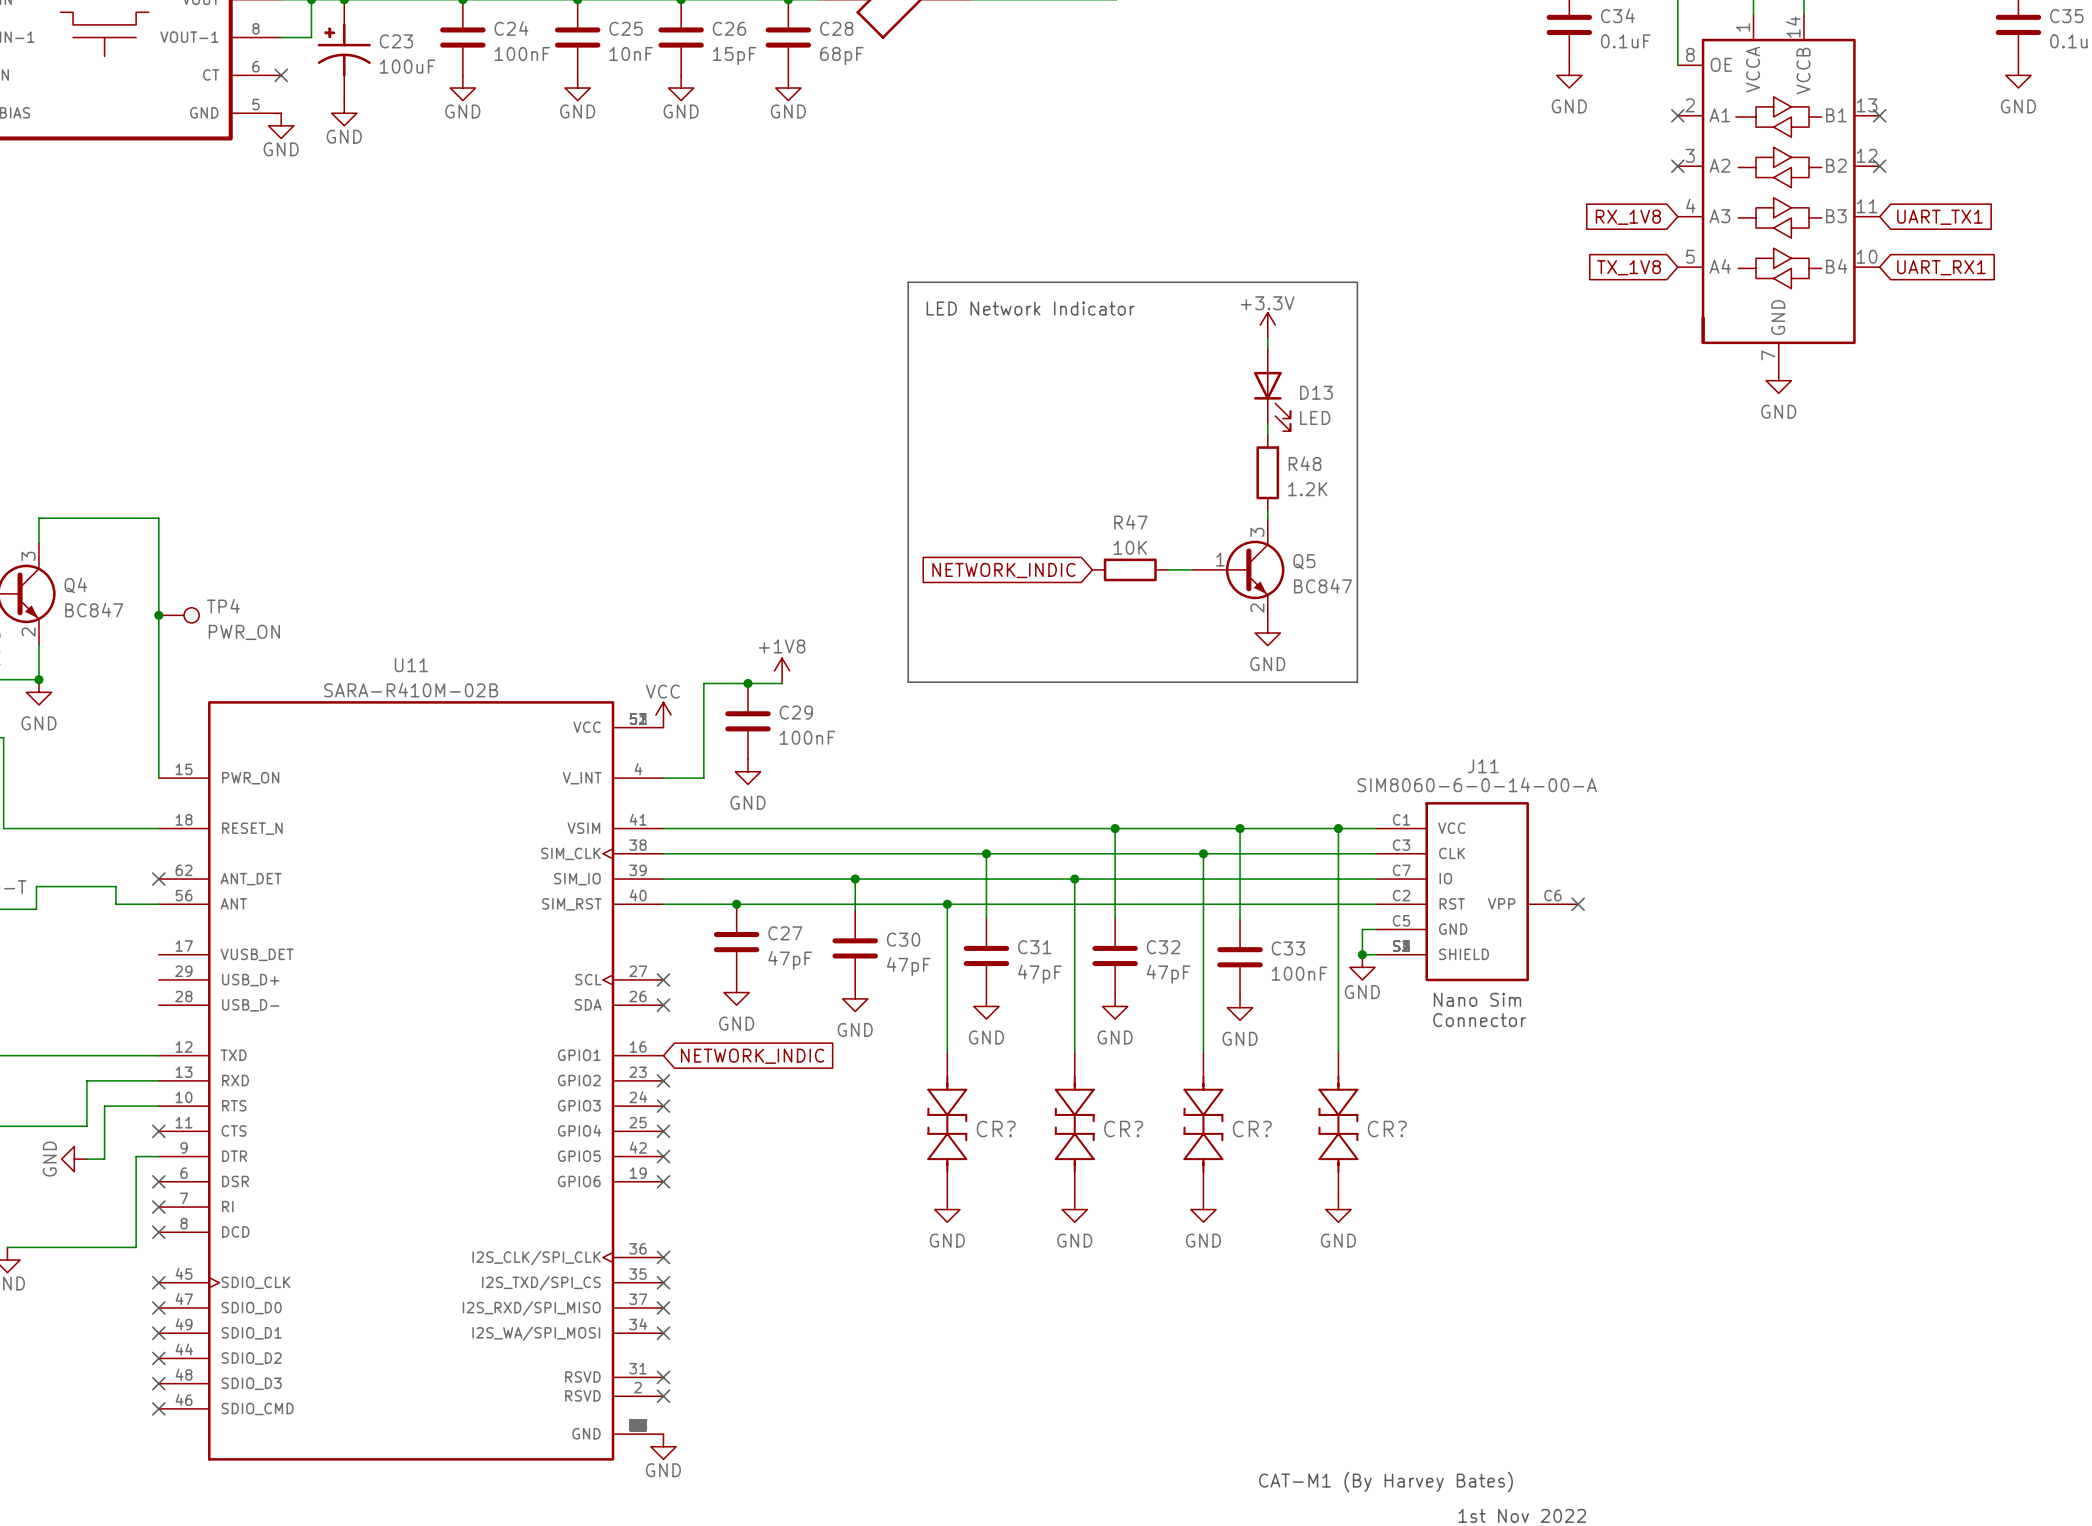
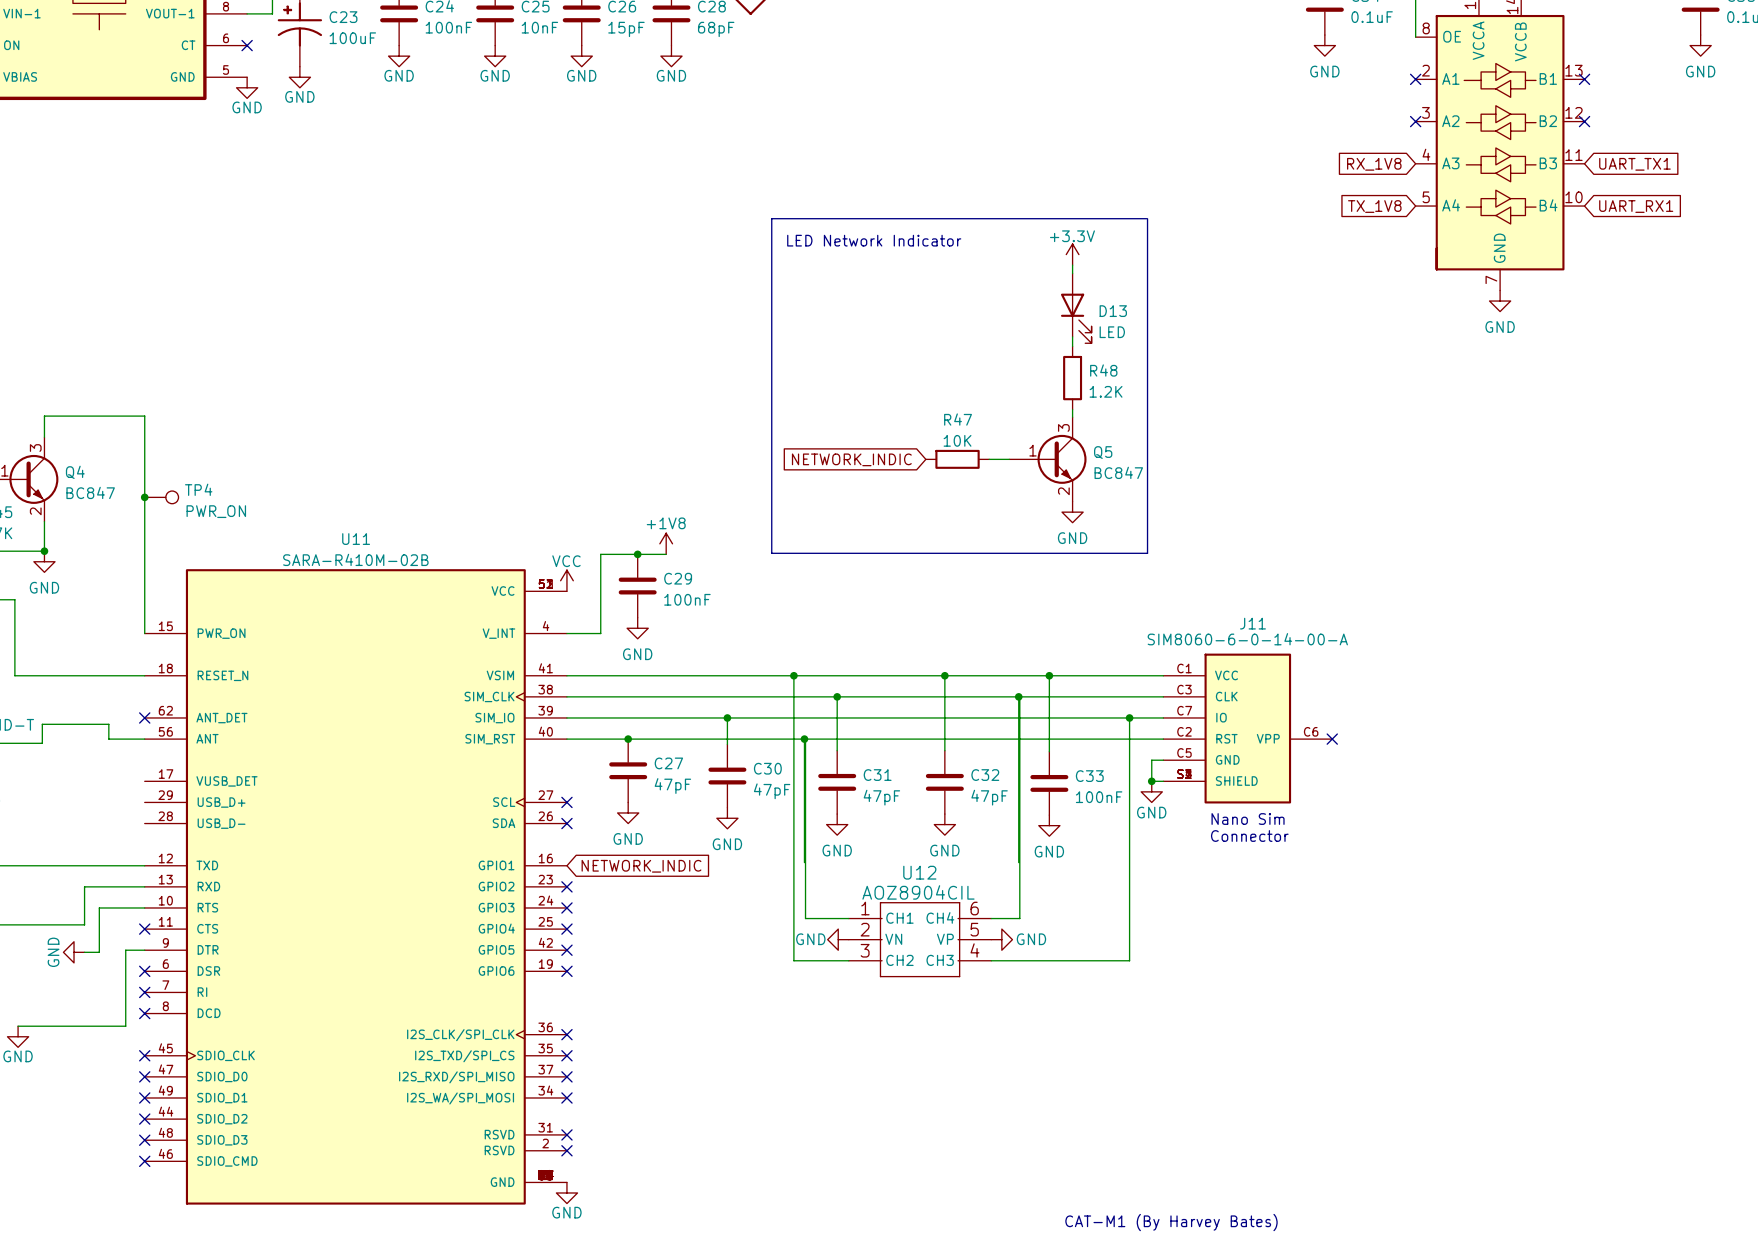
wire: none -> (793, 675) (793, 960) (848, 960)
junction: none -> (793, 675)
wire: (1338, 828) (1338, 1051) -> none
junction position: (1338, 828) -> (1129, 717)
wire: none -> (1019, 696) (1019, 918) (991, 918)
wire: (1074, 879) (1074, 1051) -> none
junction: (1074, 879) -> none
wire: none -> (1129, 717) (1129, 960) (991, 960)
wire: none -> (805, 739) (805, 918) (848, 918)
CR?: (947, 1124) -> none
CR?: (1074, 1124) -> none
CR?: (1203, 1124) -> none
CR?: (1338, 1124) -> none
power symbol: none -> GND (838, 939)
U12: none -> AOZ8904CIL (920, 939)
power symbol: none -> GND (1001, 939)
power symbol: GND (947, 1209) -> none
power symbol: GND (1074, 1209) -> none
power symbol: GND (1203, 1209) -> none
power symbol: GND (1338, 1209) -> none

